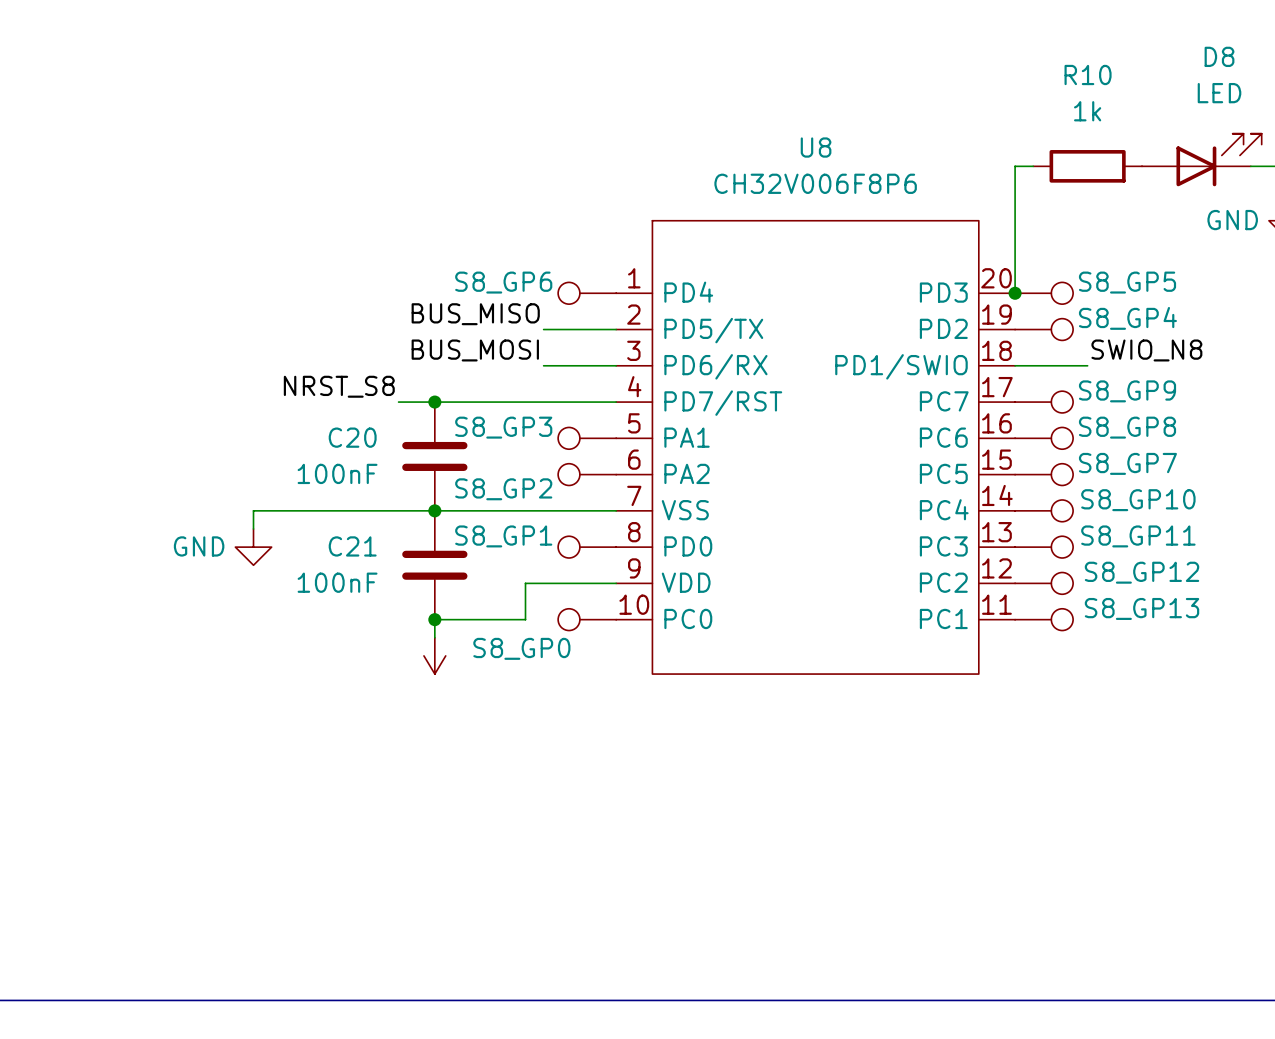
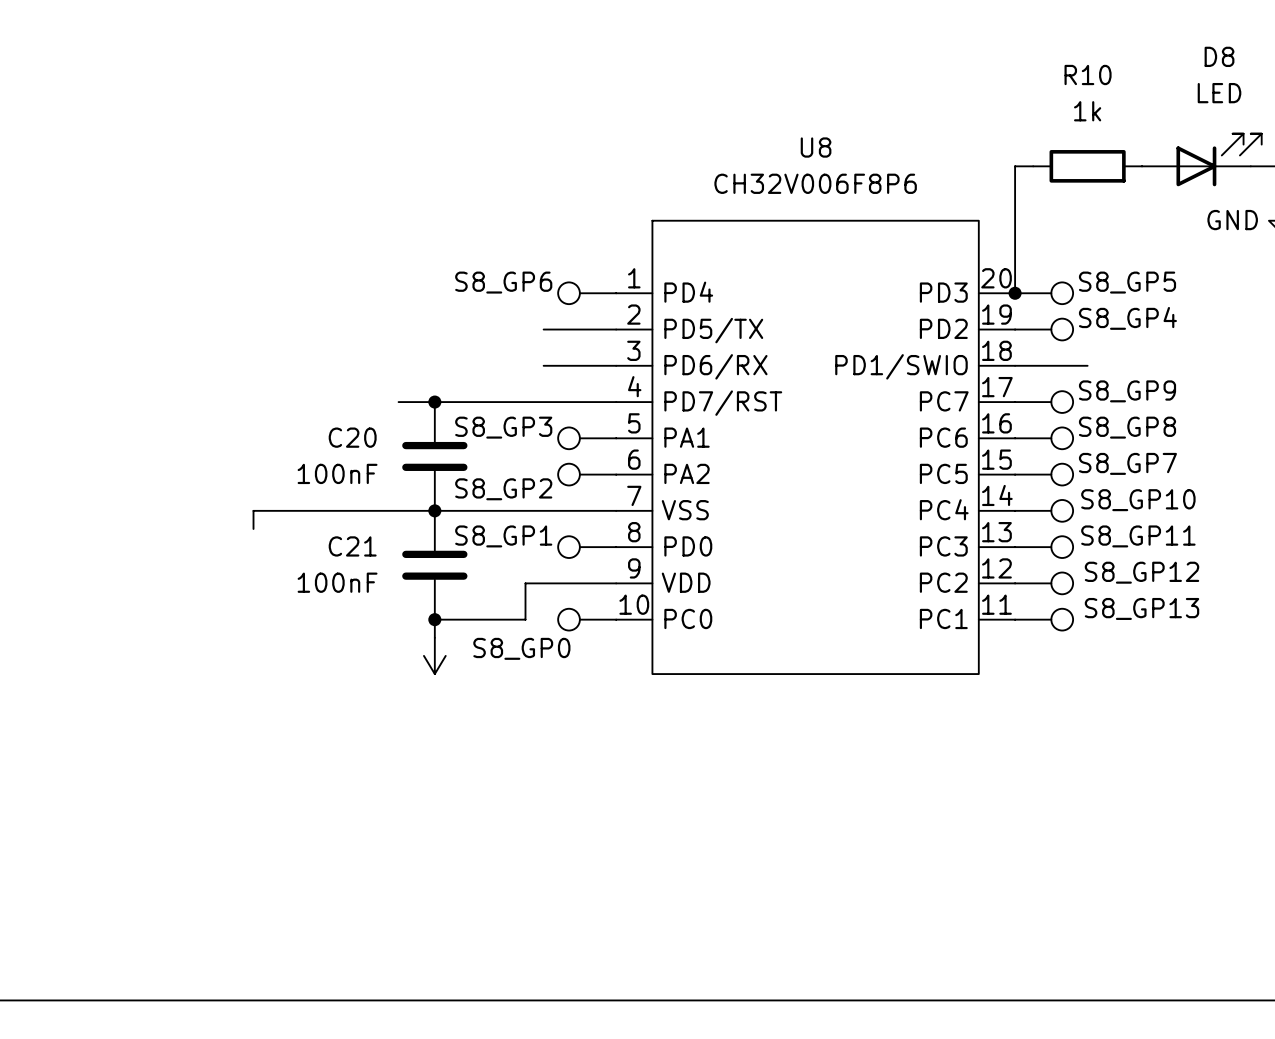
label: BUS_MISO (475, 314) -> none
label: BUS_MOSI (475, 350) -> none
label: SWIO_N8 (1146, 350) -> none
label: NRST_S8 (339, 386) -> none
power symbol: GND (253, 547) -> none

